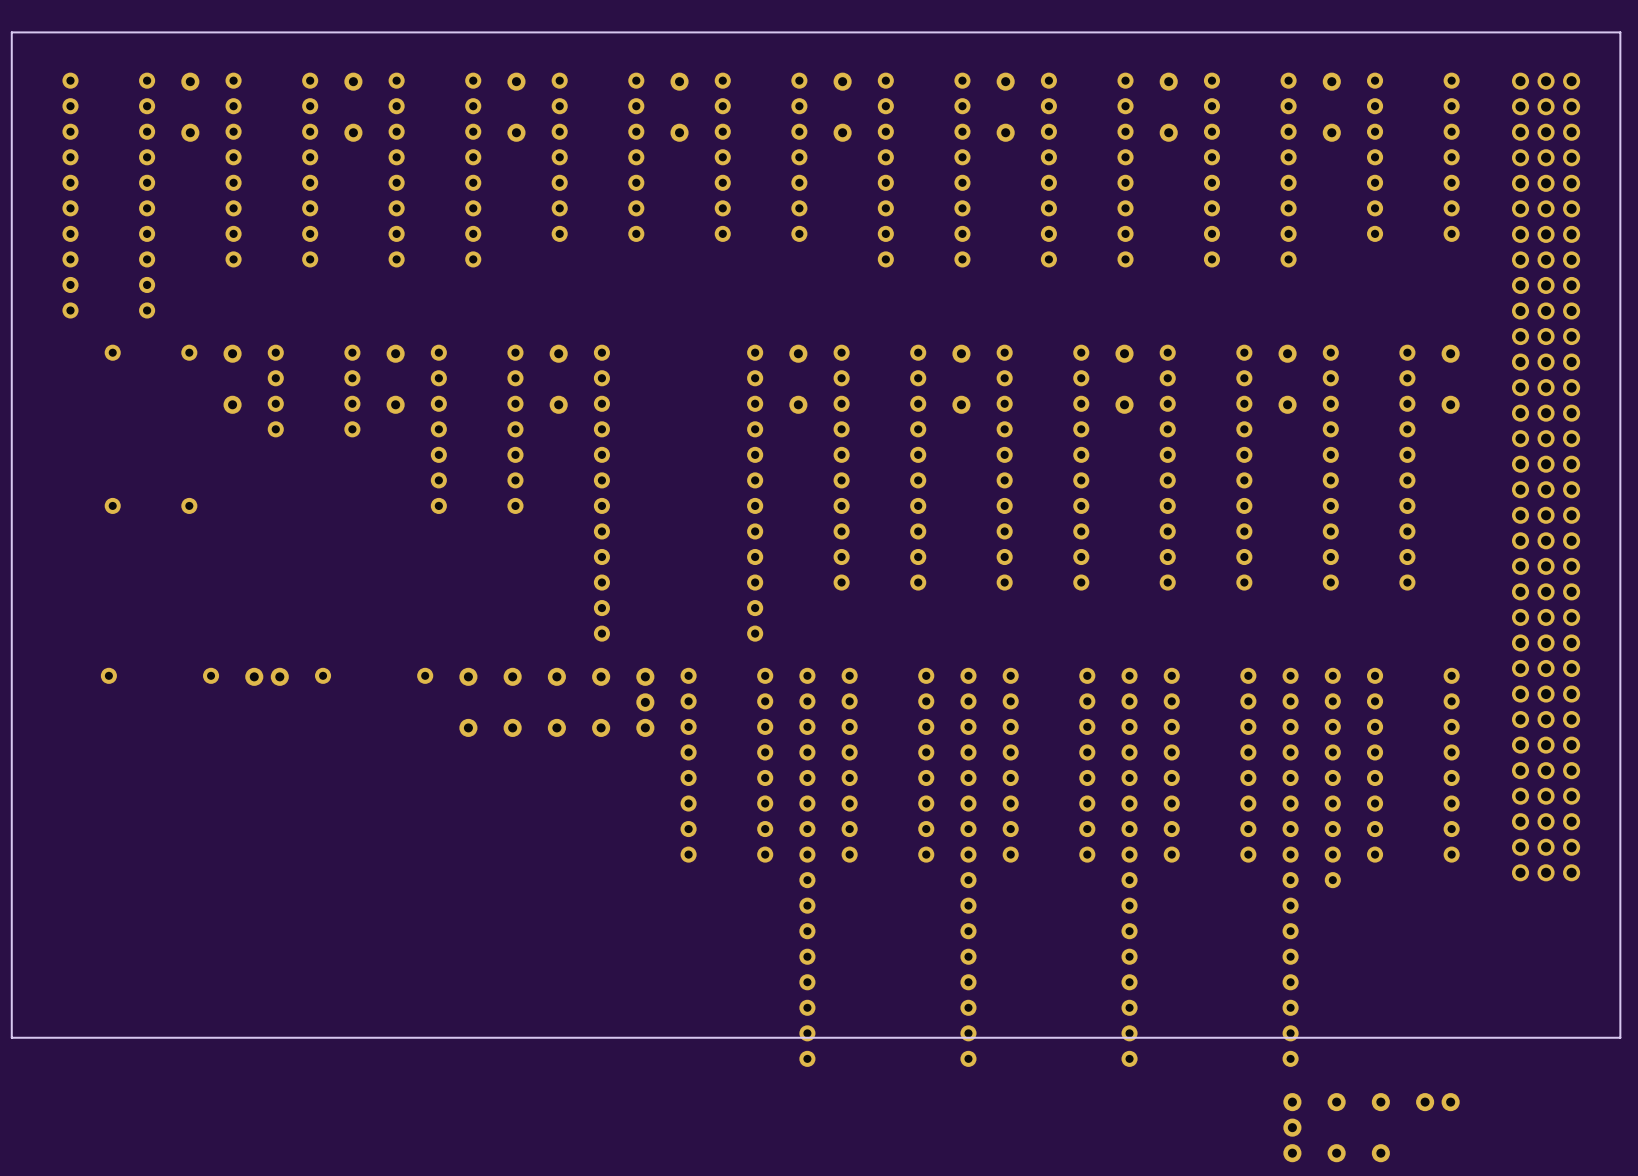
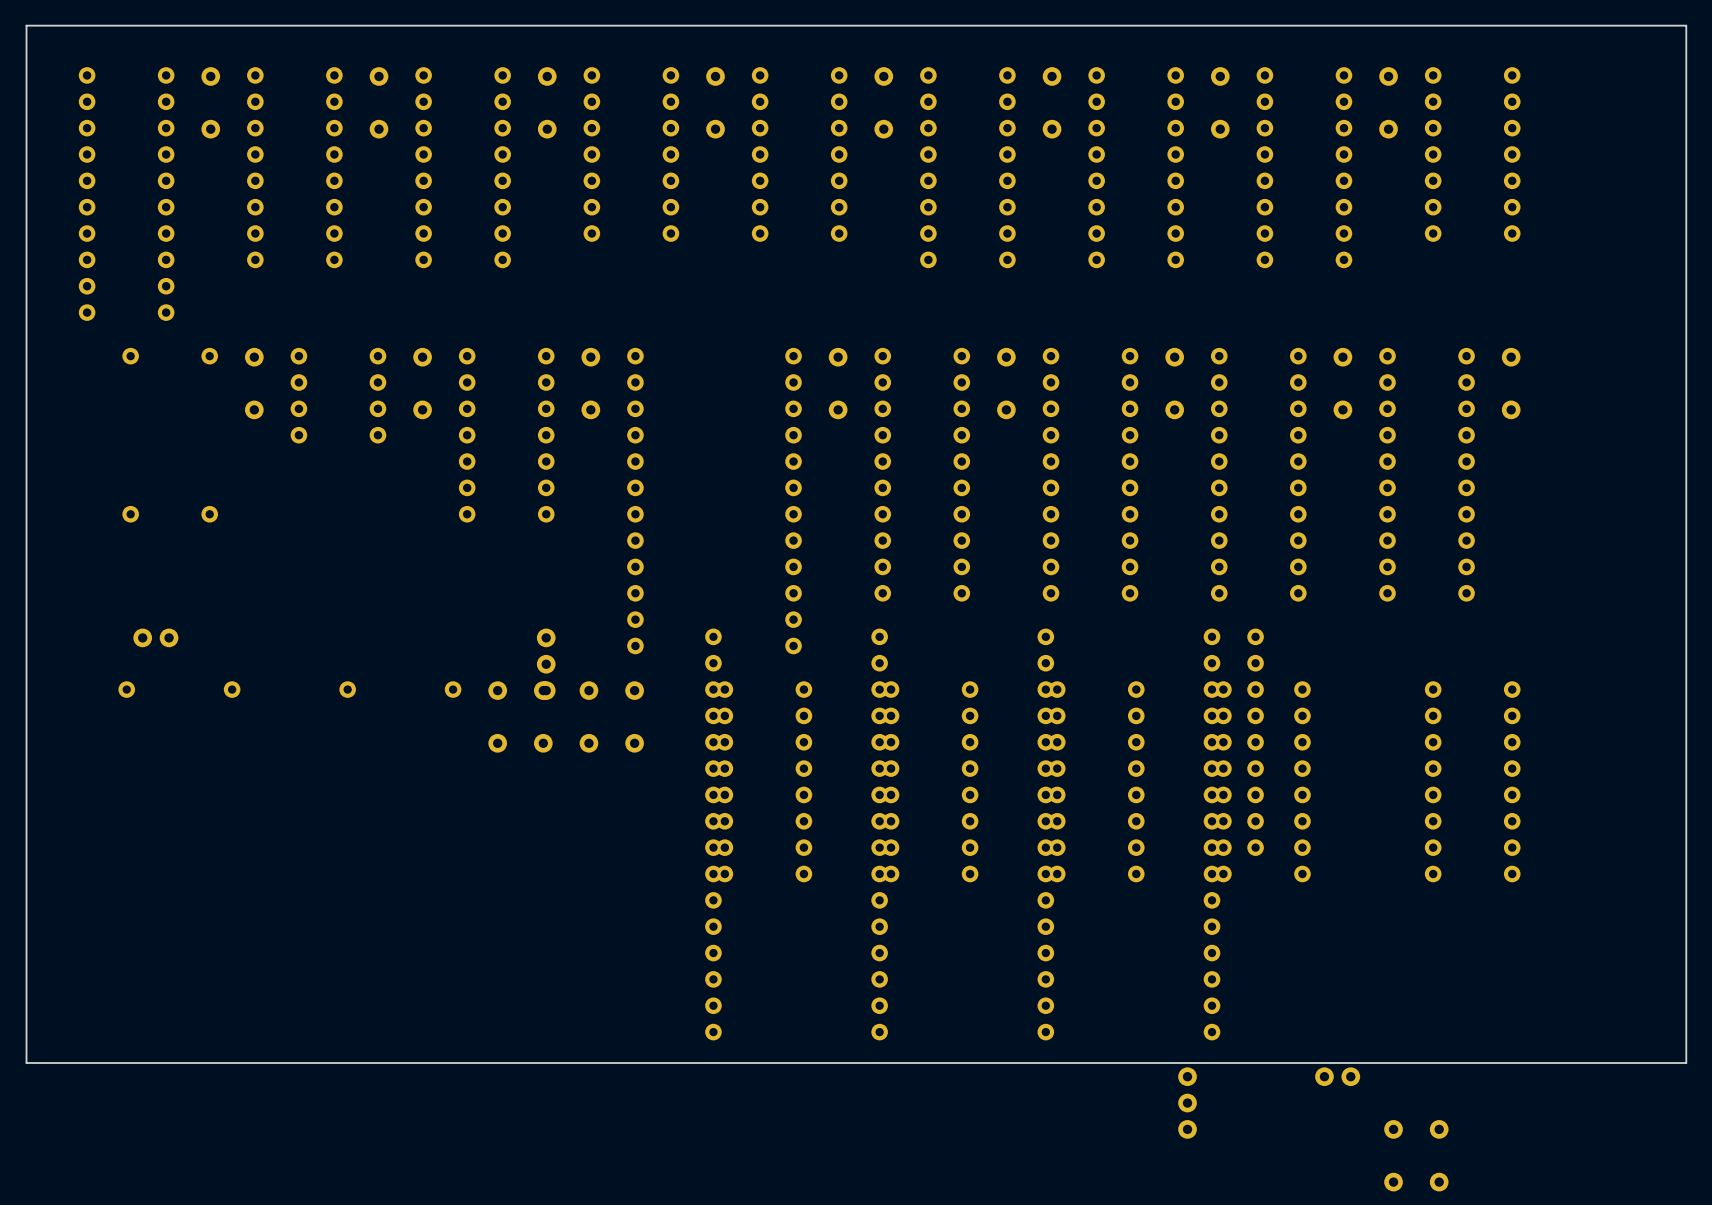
part: (1546, 476) -> none
part position: (267, 676) -> (155, 637)
part position: (645, 702) -> (546, 664)
part position: (1332, 777) -> (1255, 742)
part: none -> (713, 834)
part position: (807, 867) -> (879, 834)
part position: (968, 867) -> (1045, 834)
part position: (1129, 867) -> (1212, 834)
part: (1290, 867) -> none
part position: (1437, 1102) -> (1337, 1076)
part position: (1292, 1127) -> (1187, 1103)

